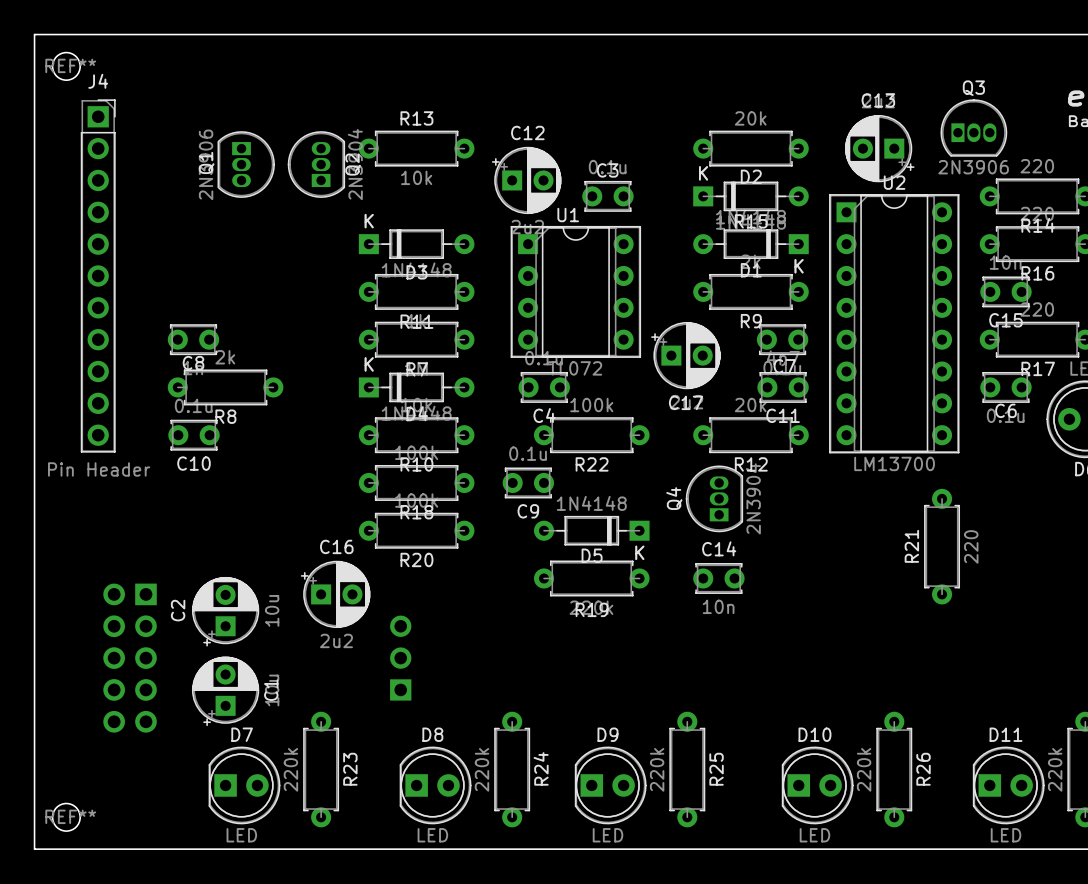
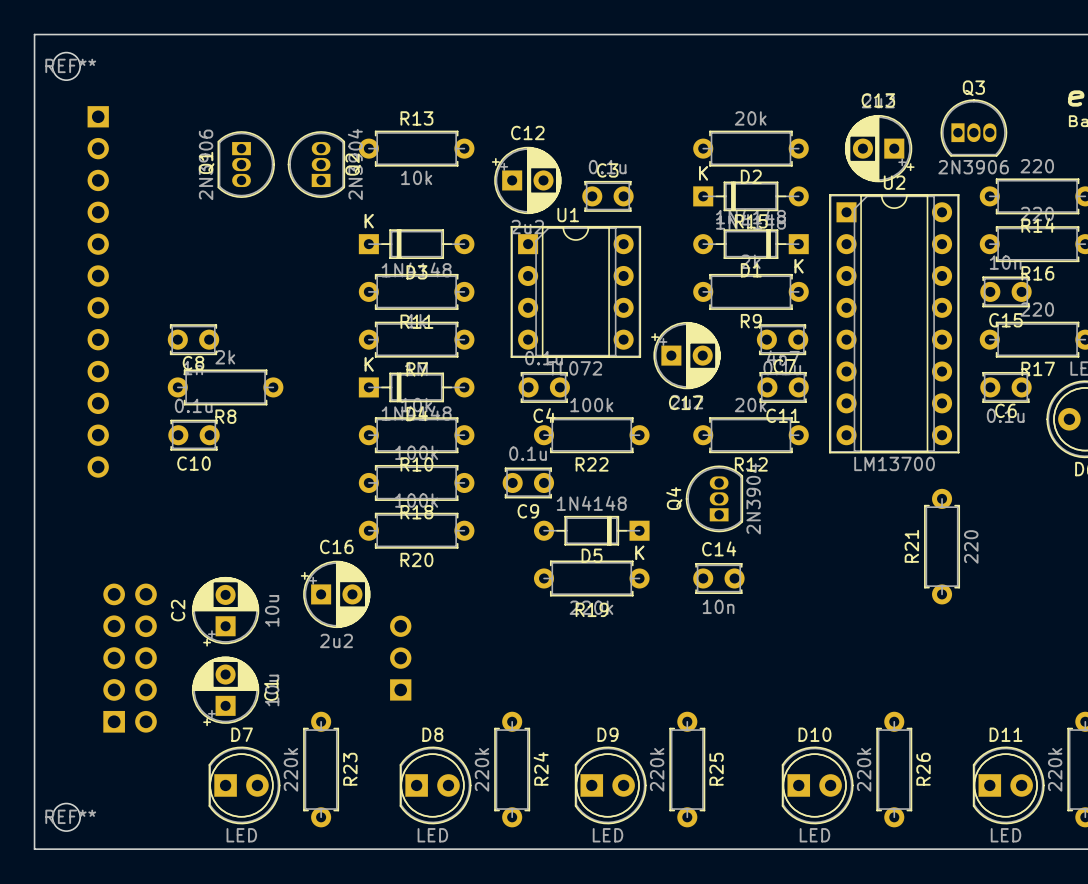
J4: Pin Header (98, 275) -> none
part: none -> (98, 291)
part rotation: 0° (130, 658) -> 180° (130, 658)

